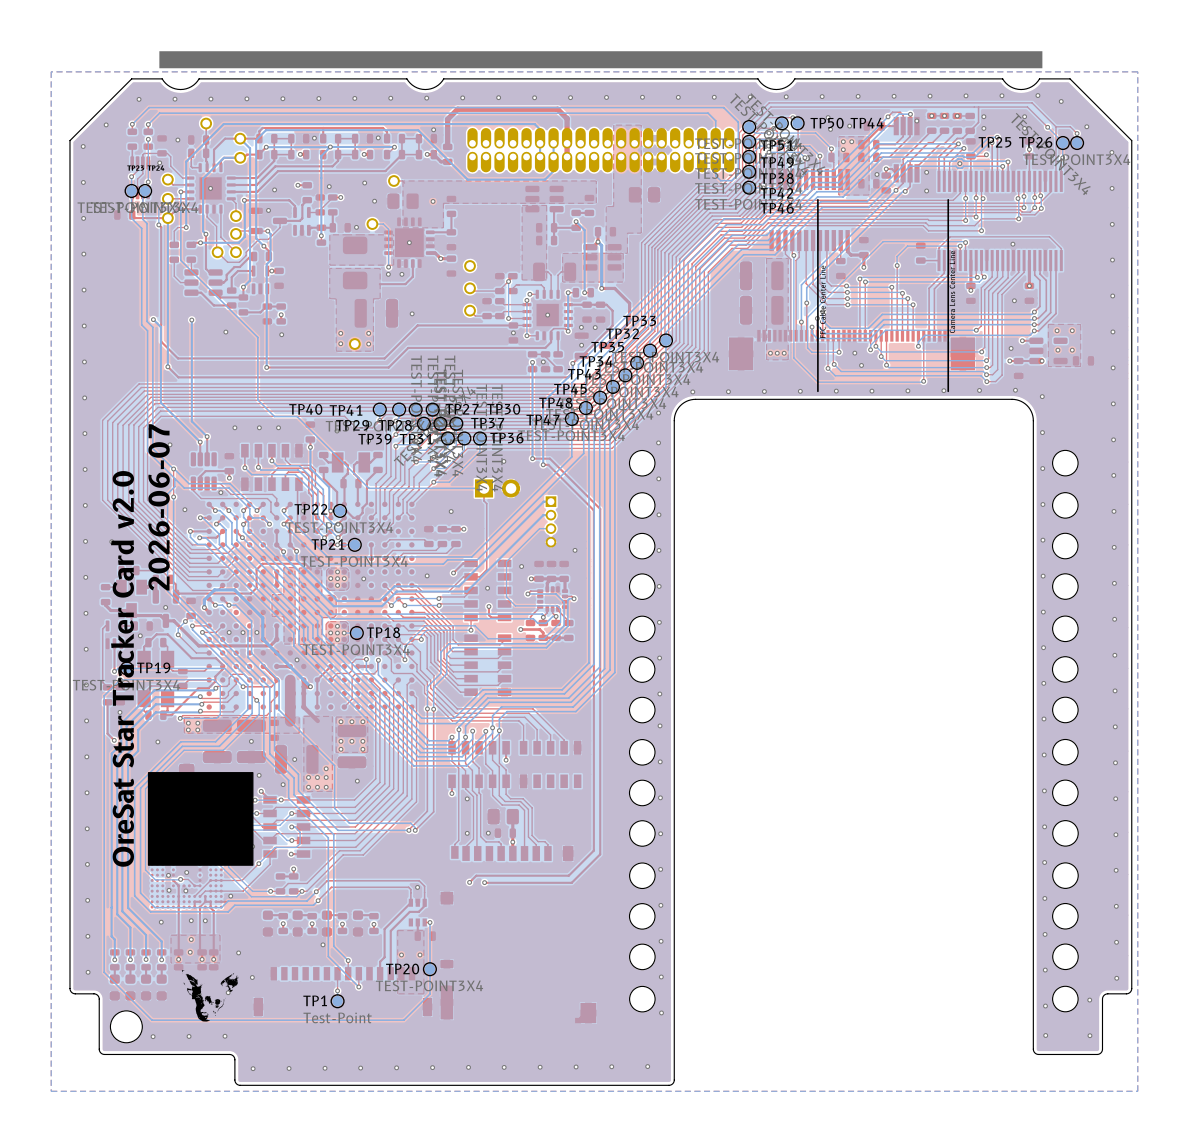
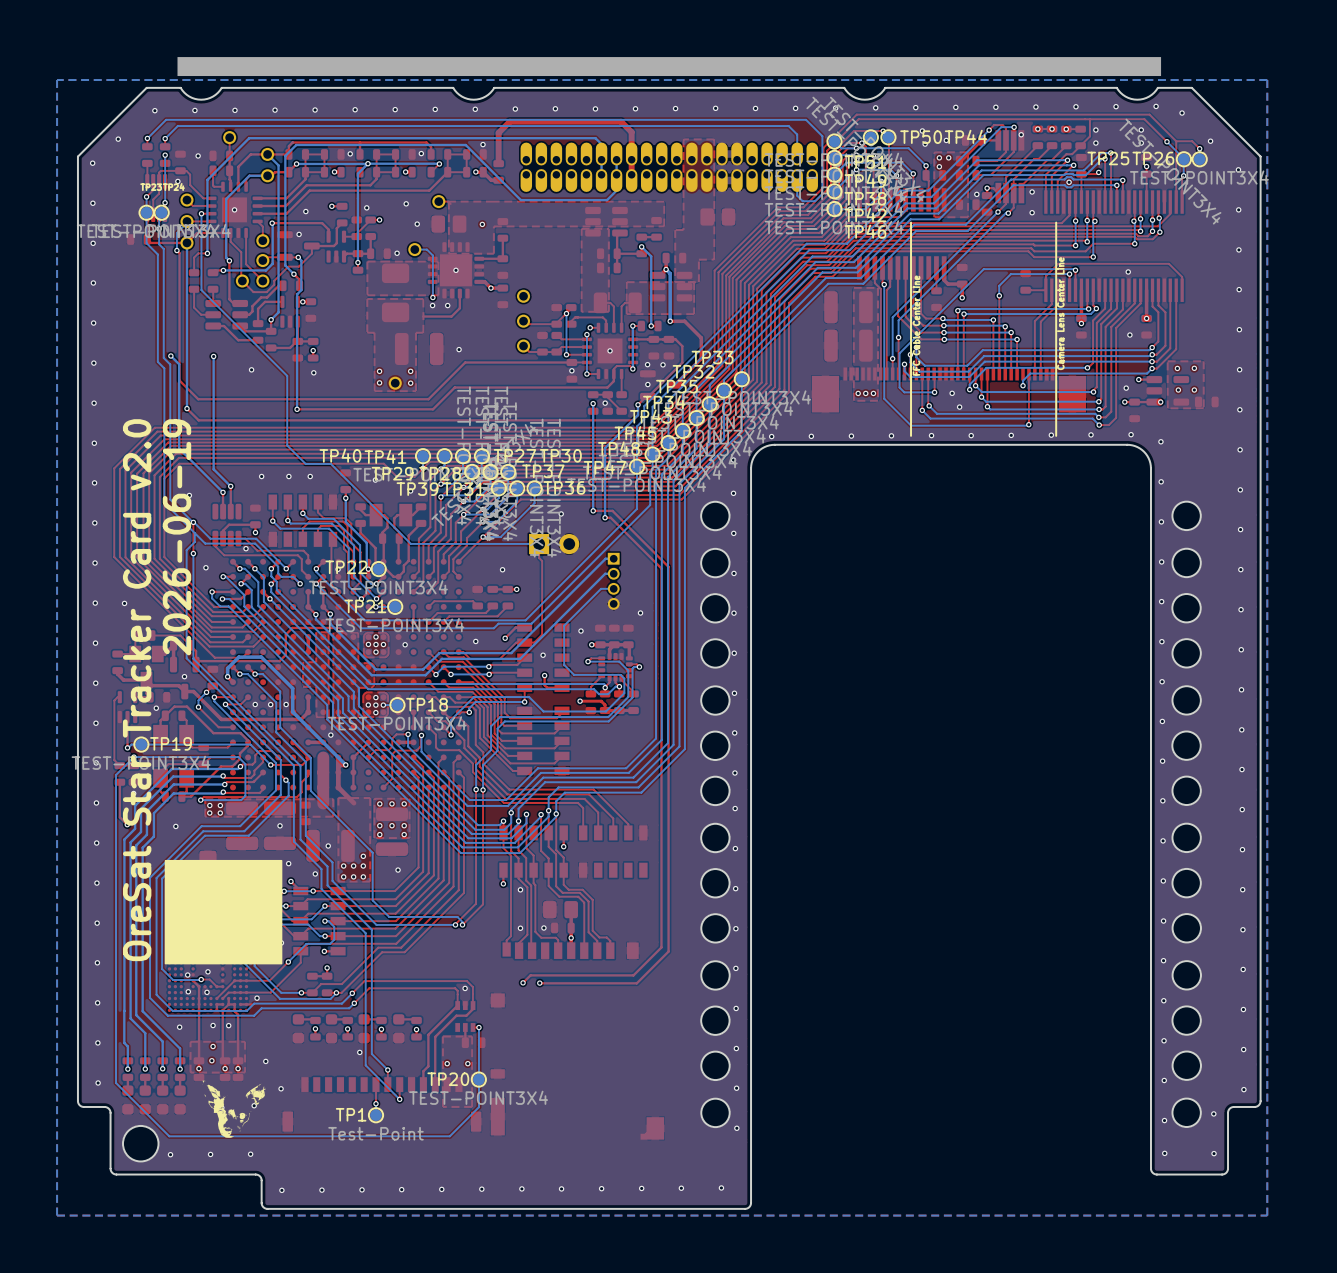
text: 2026-06-07 (159, 507) -> 2026-06-19 (176, 537)

